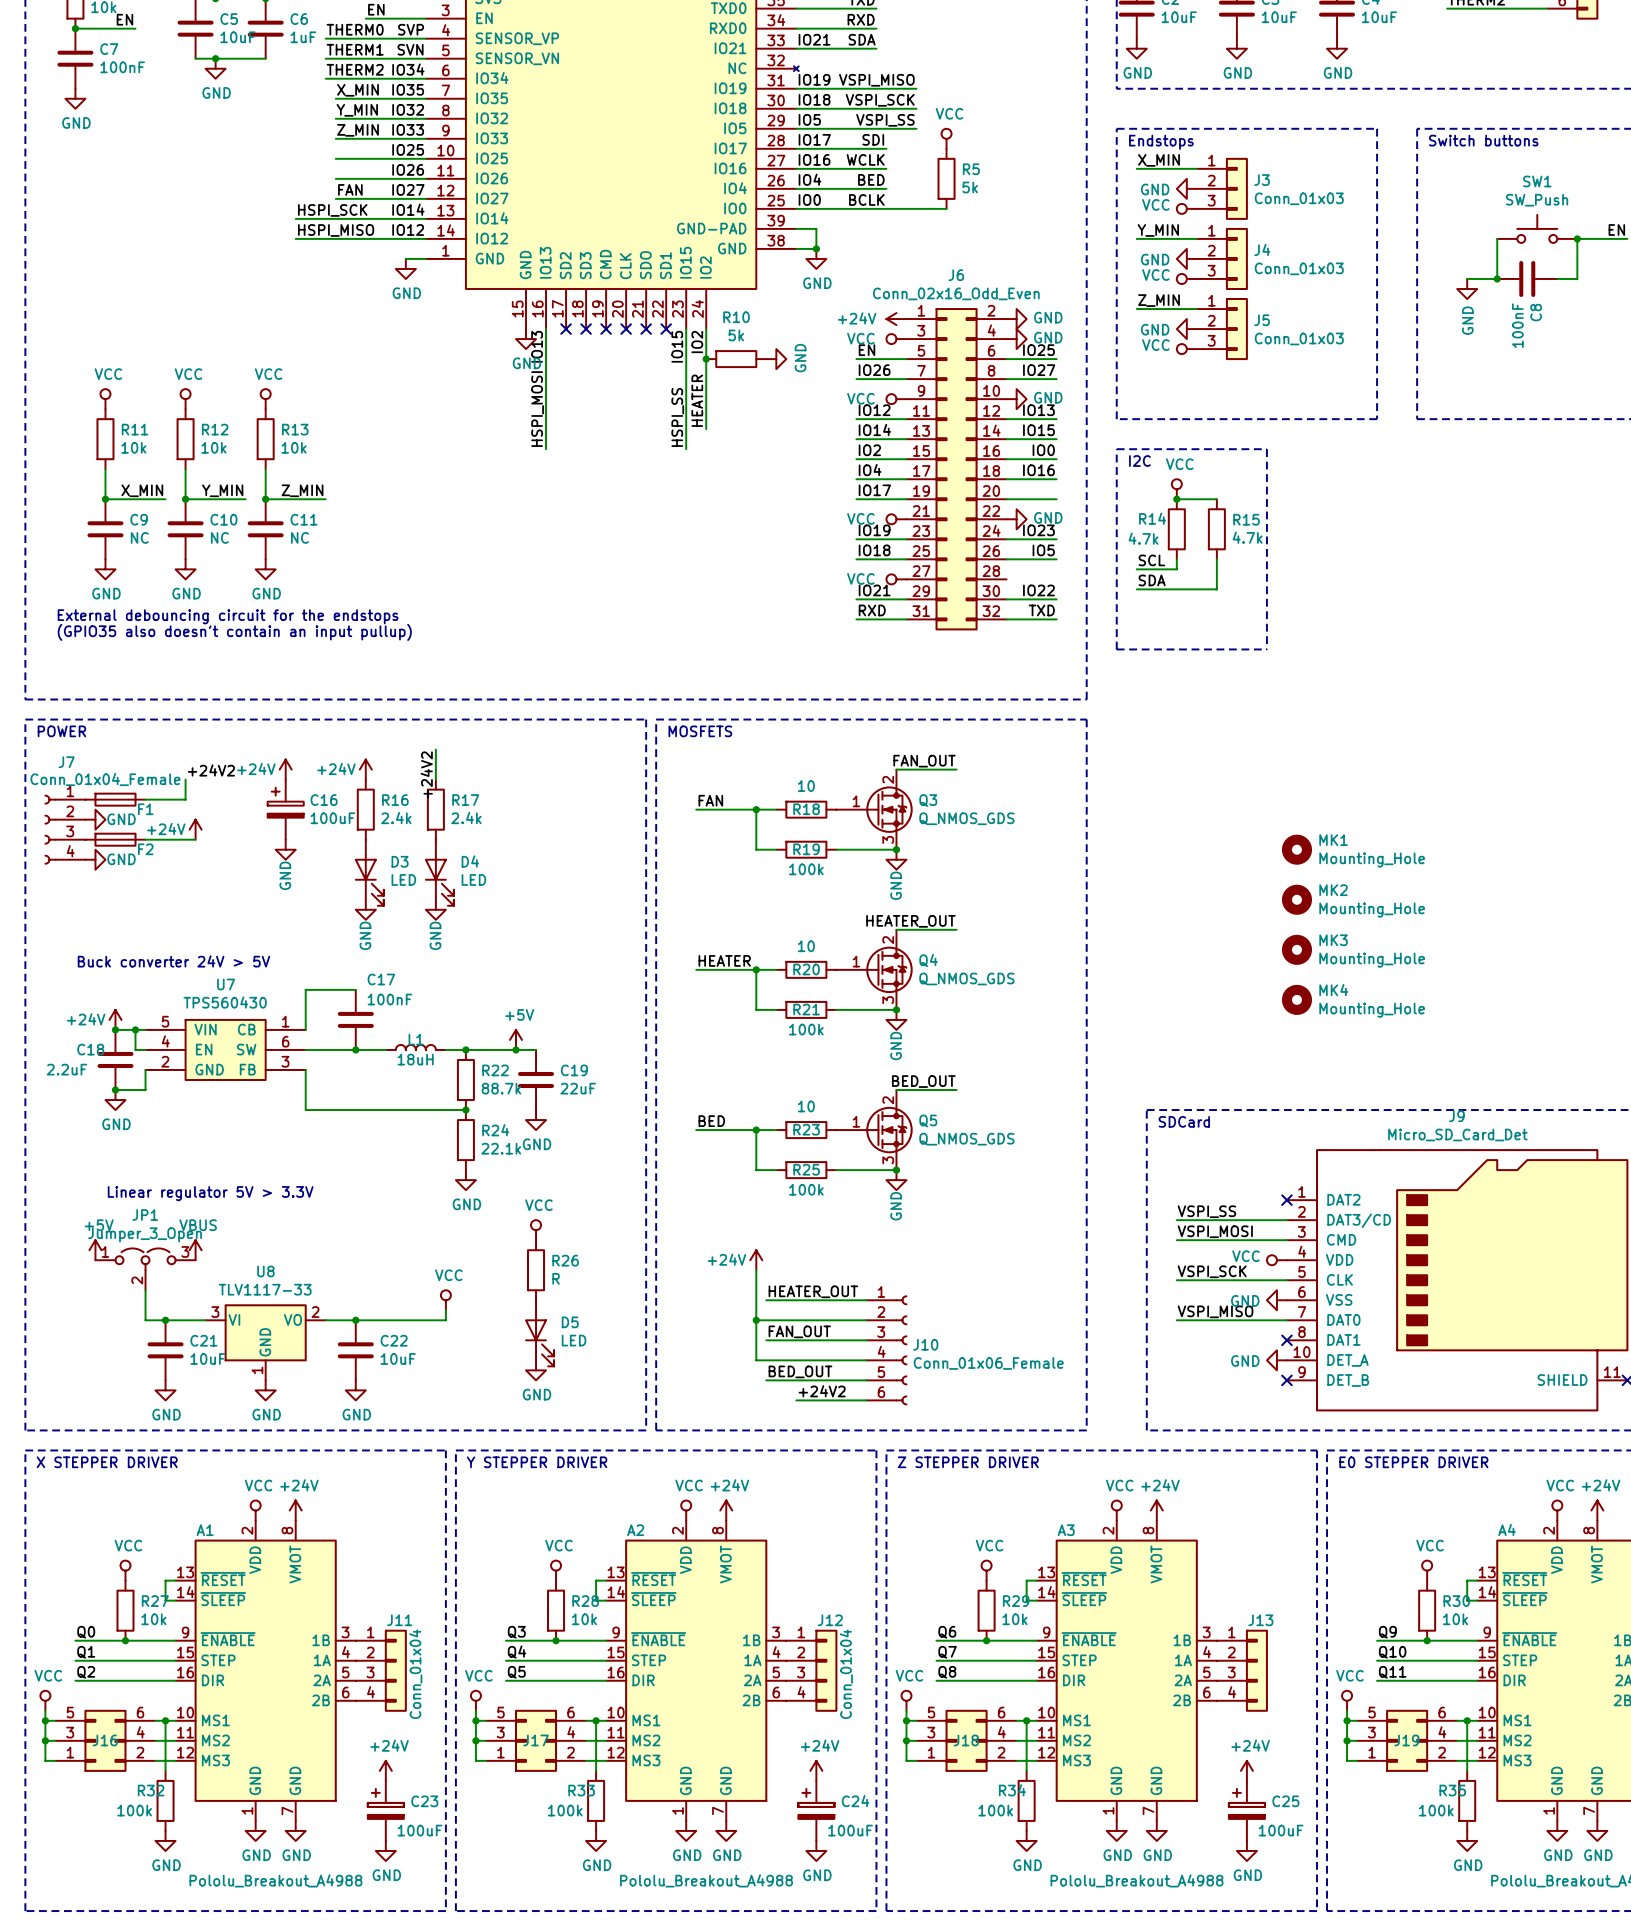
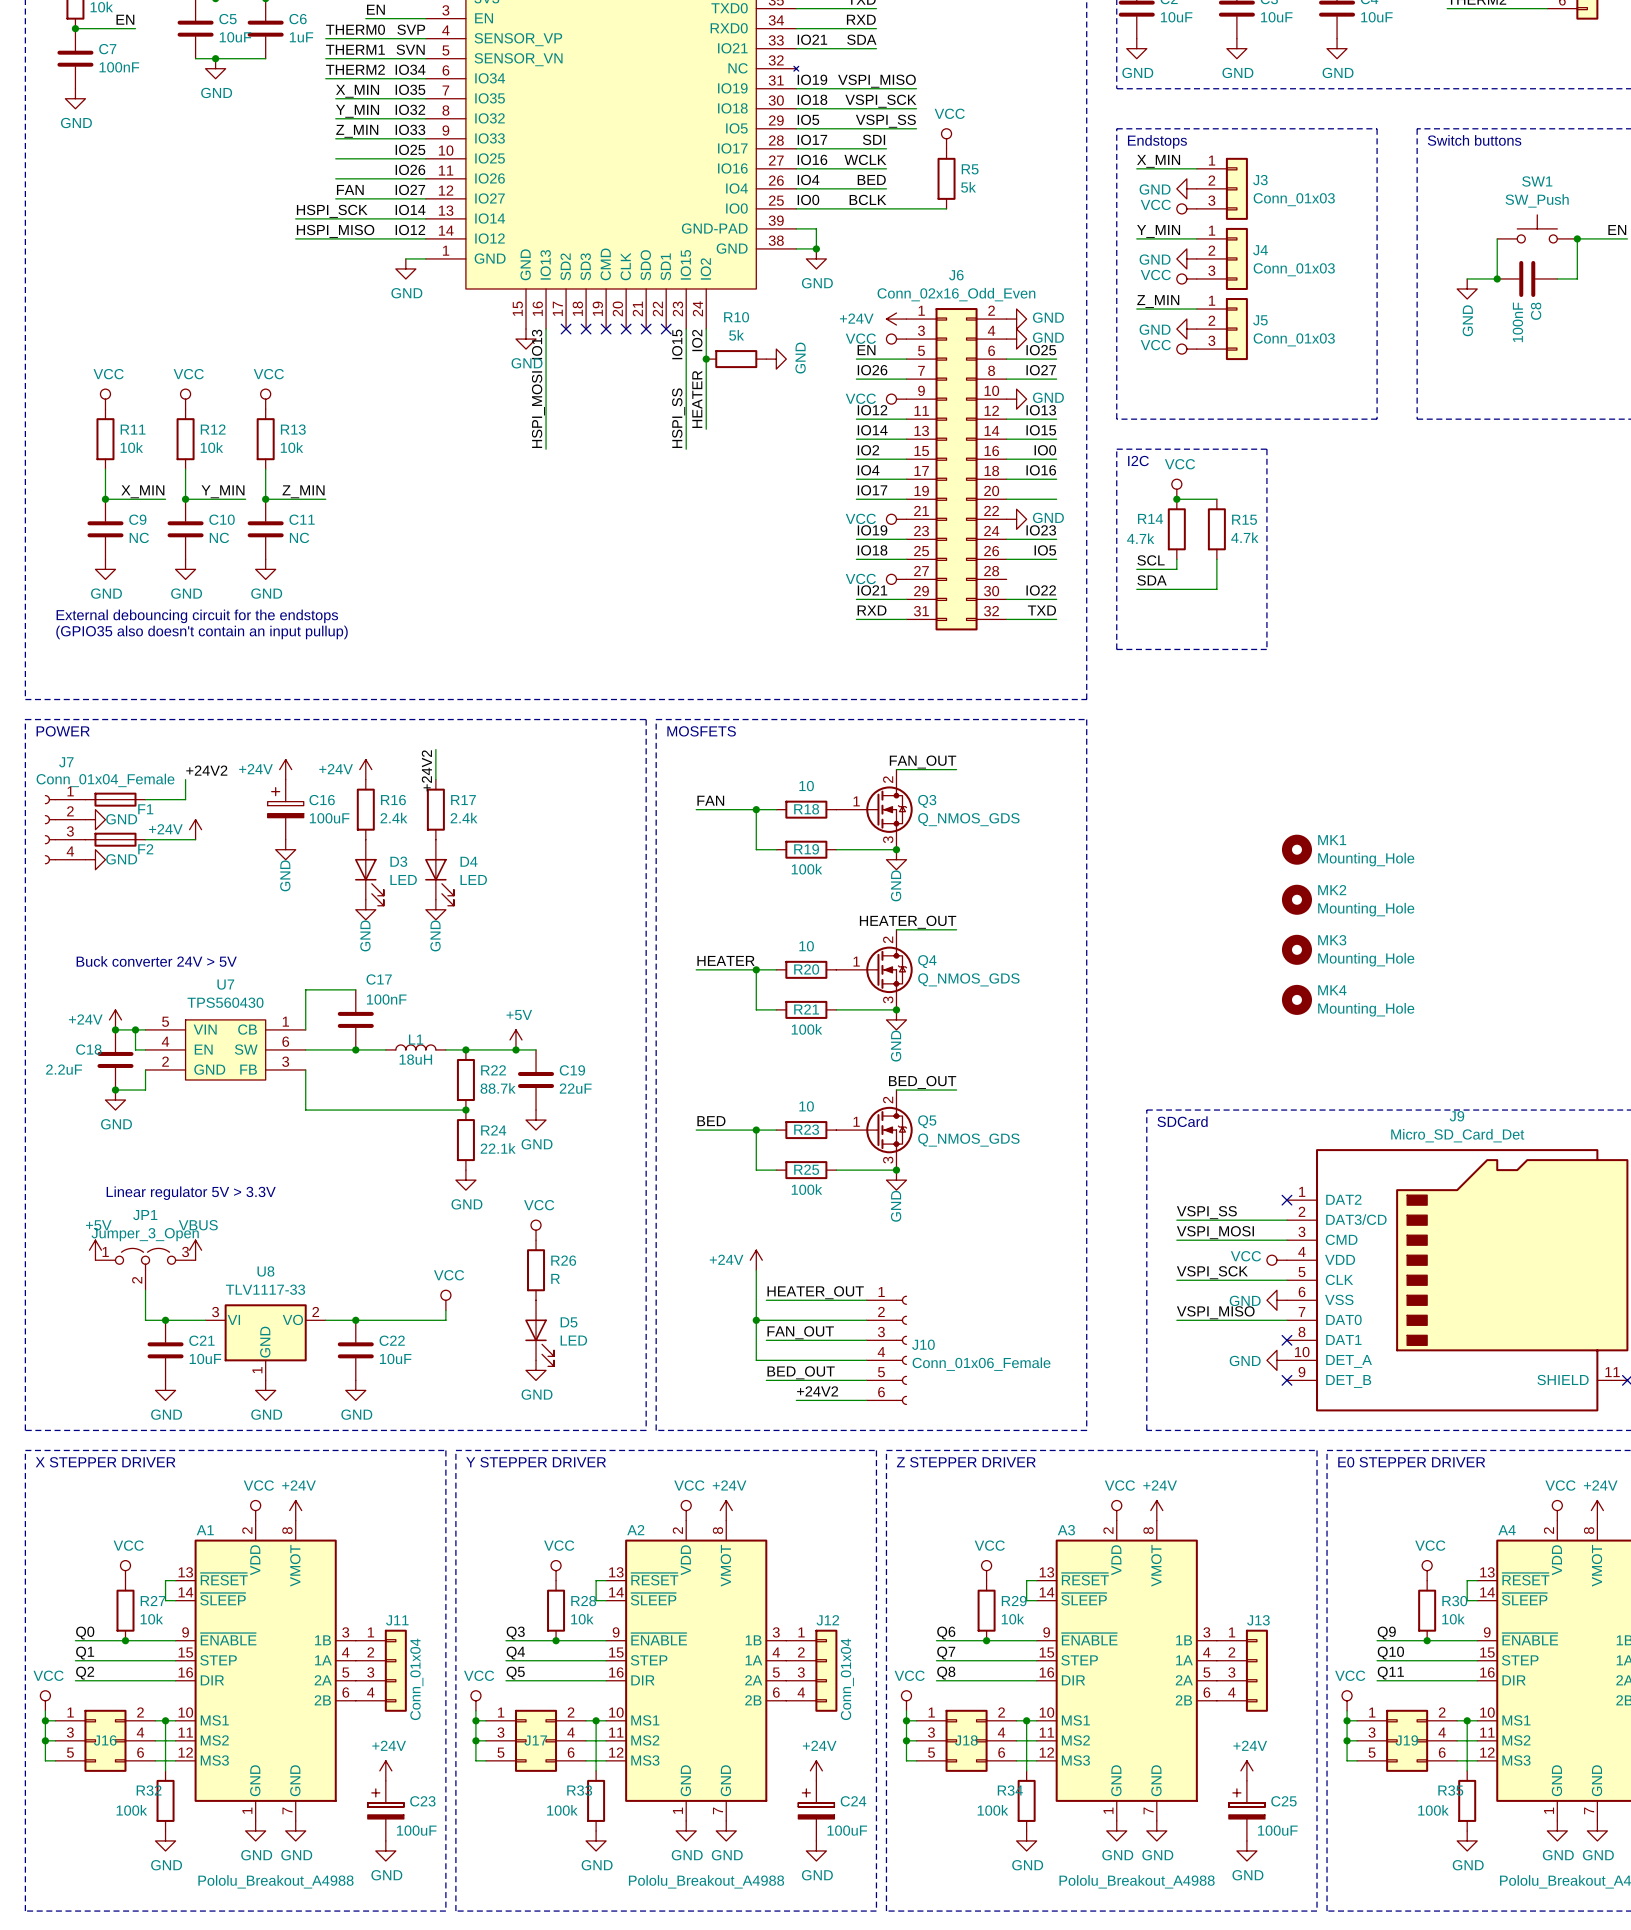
J16 flip: as is (105, 1740) -> up-down (105, 1740)
J17 flip: as is (536, 1740) -> up-down (536, 1740)
J18 flip: as is (966, 1740) -> up-down (966, 1740)
J19 flip: as is (1407, 1740) -> up-down (1407, 1740)

